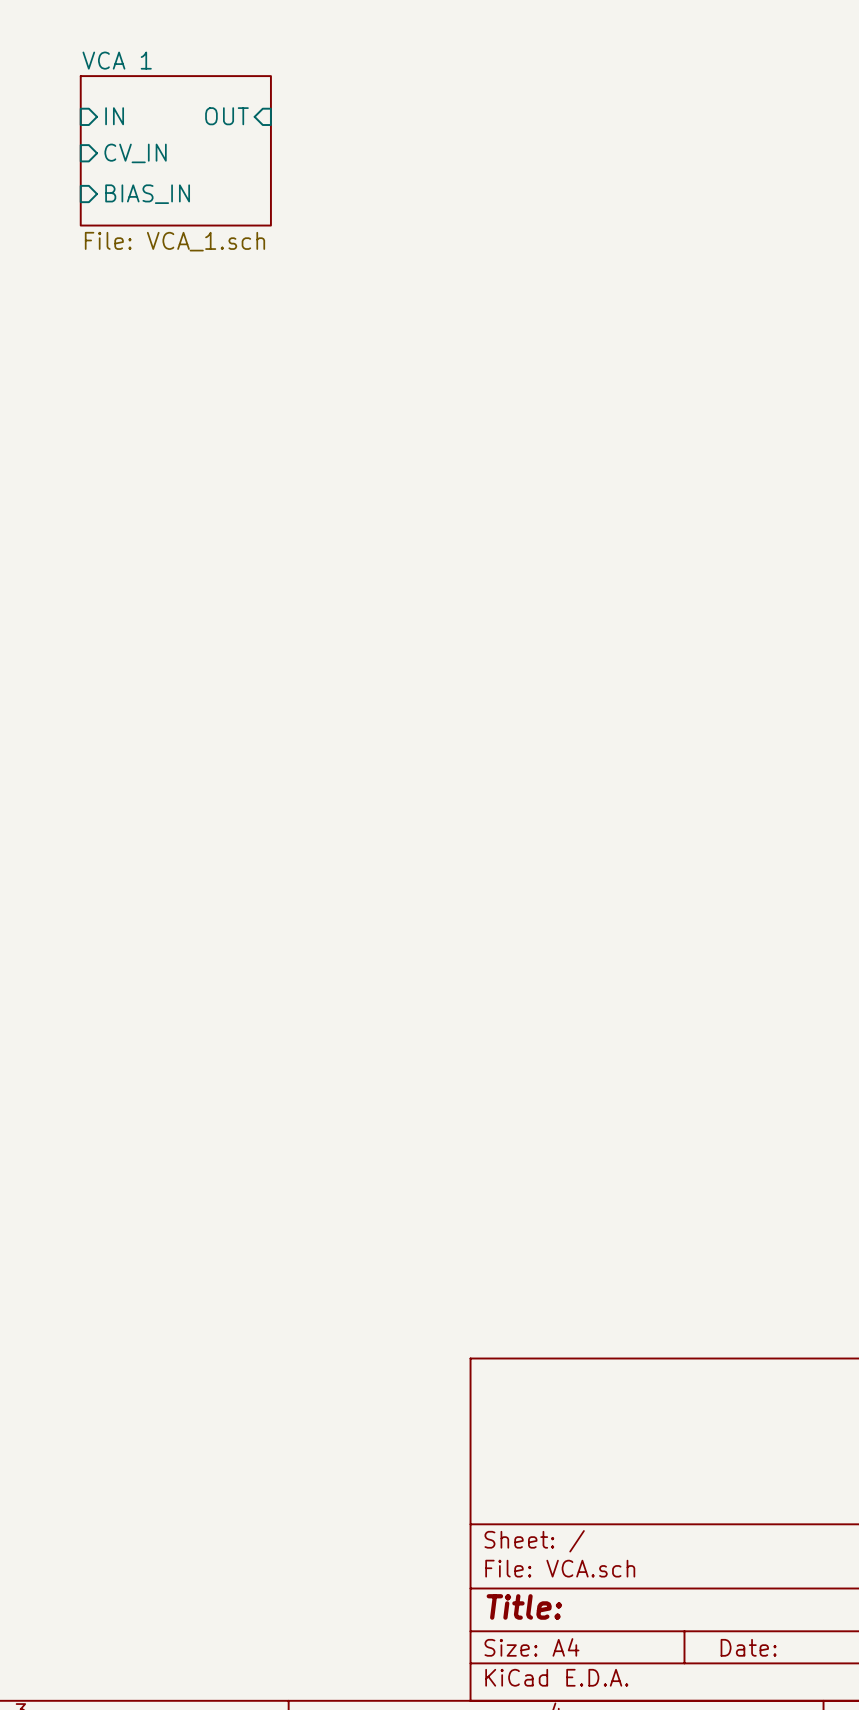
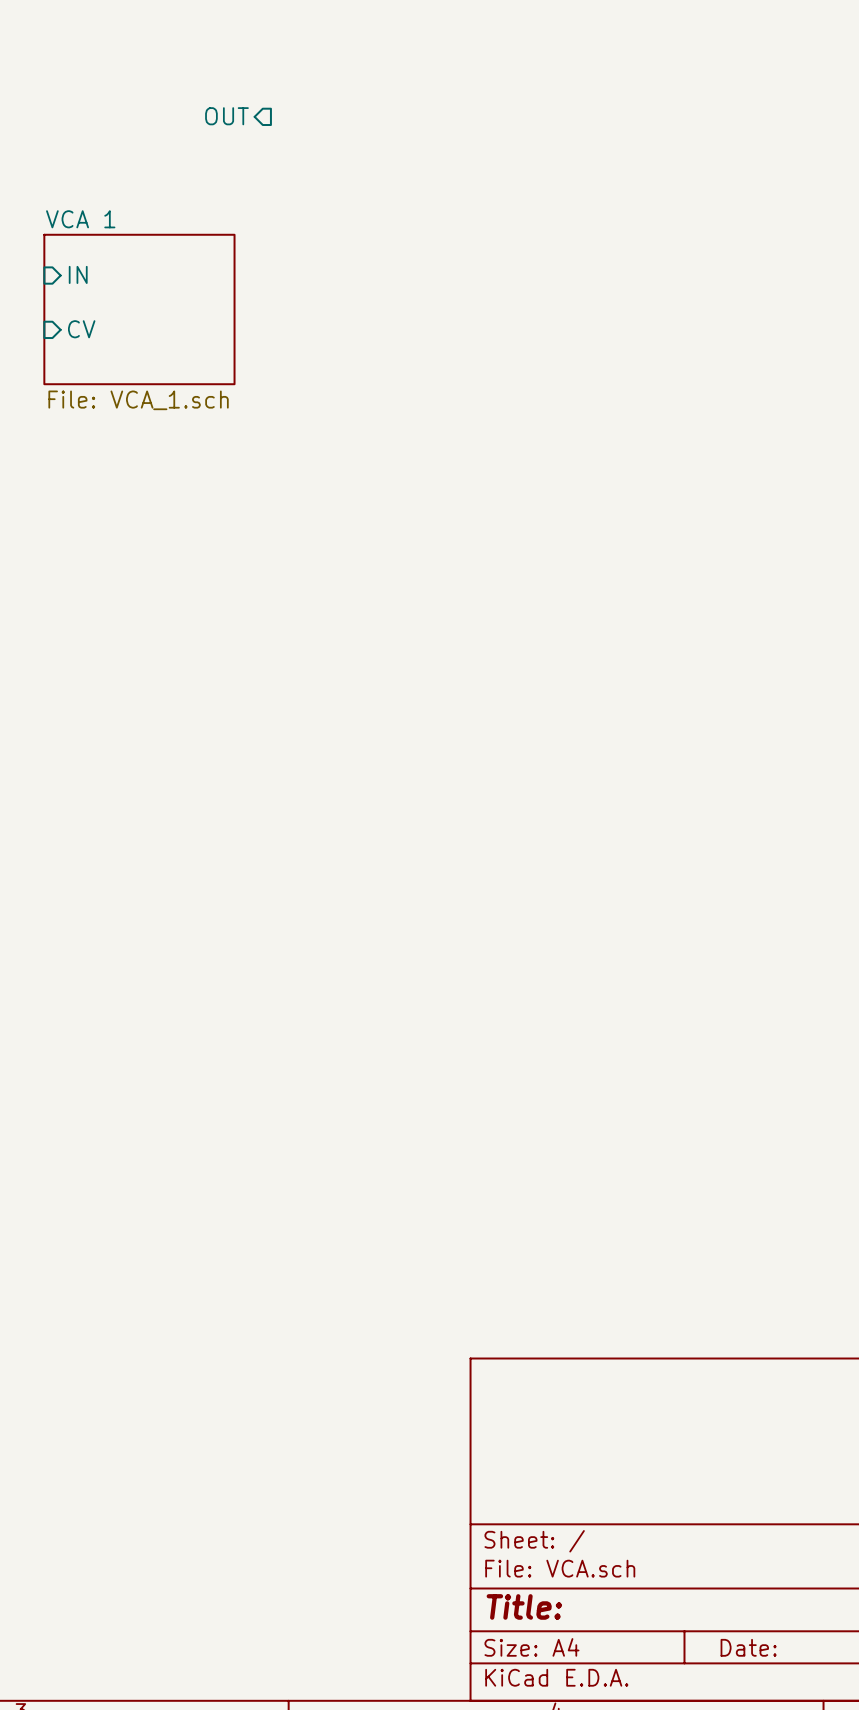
sheet pin position: IN (114, 116) -> IN (78, 274)
sheet VCA 1 position: (175, 150) -> (139, 309)
sheet pin: CV_IN (135, 153) -> none
sheet pin: BIAS_IN (147, 194) -> none
sheet pin: none -> CV (81, 329)

